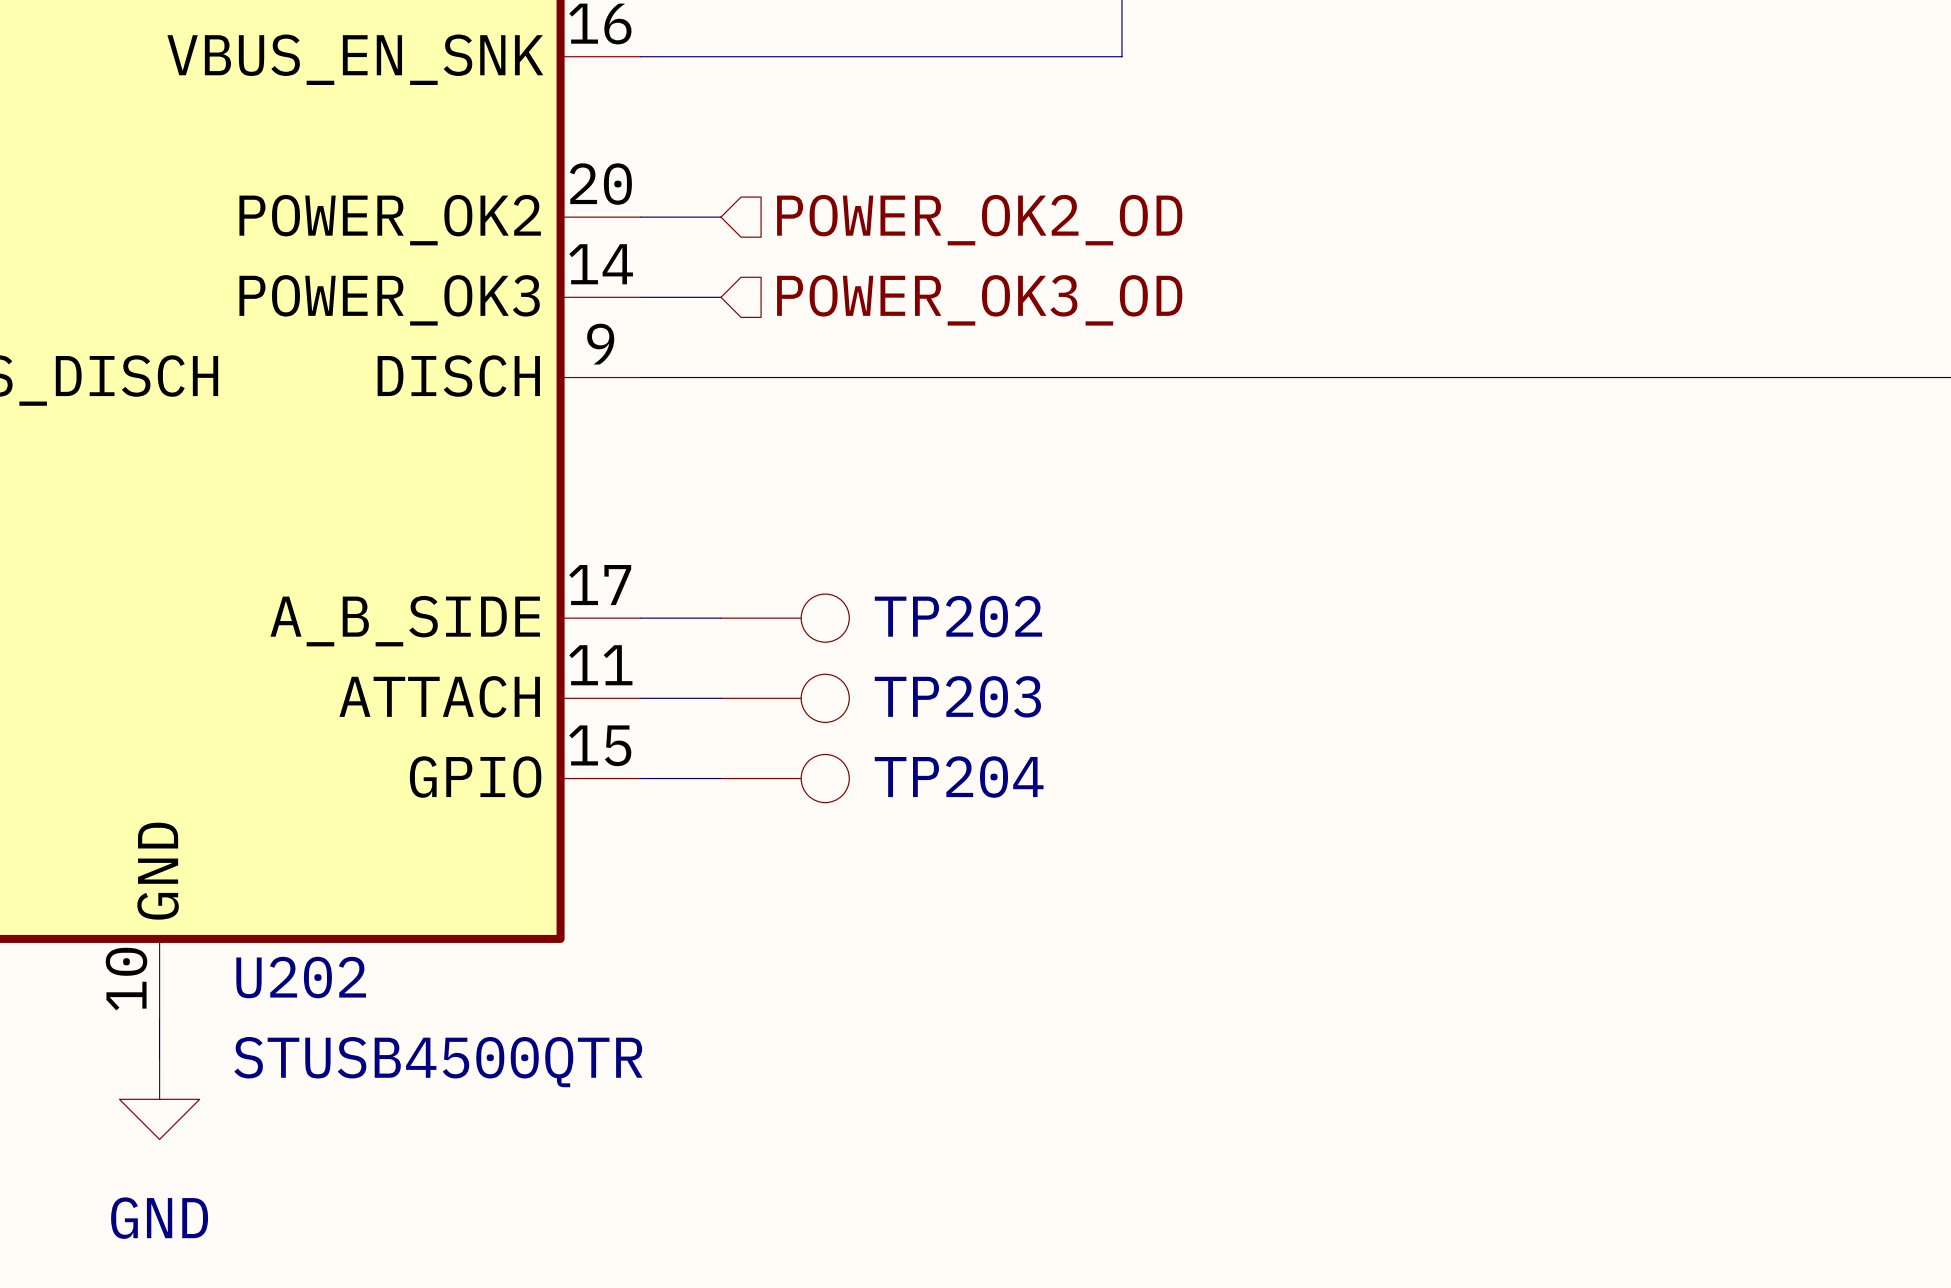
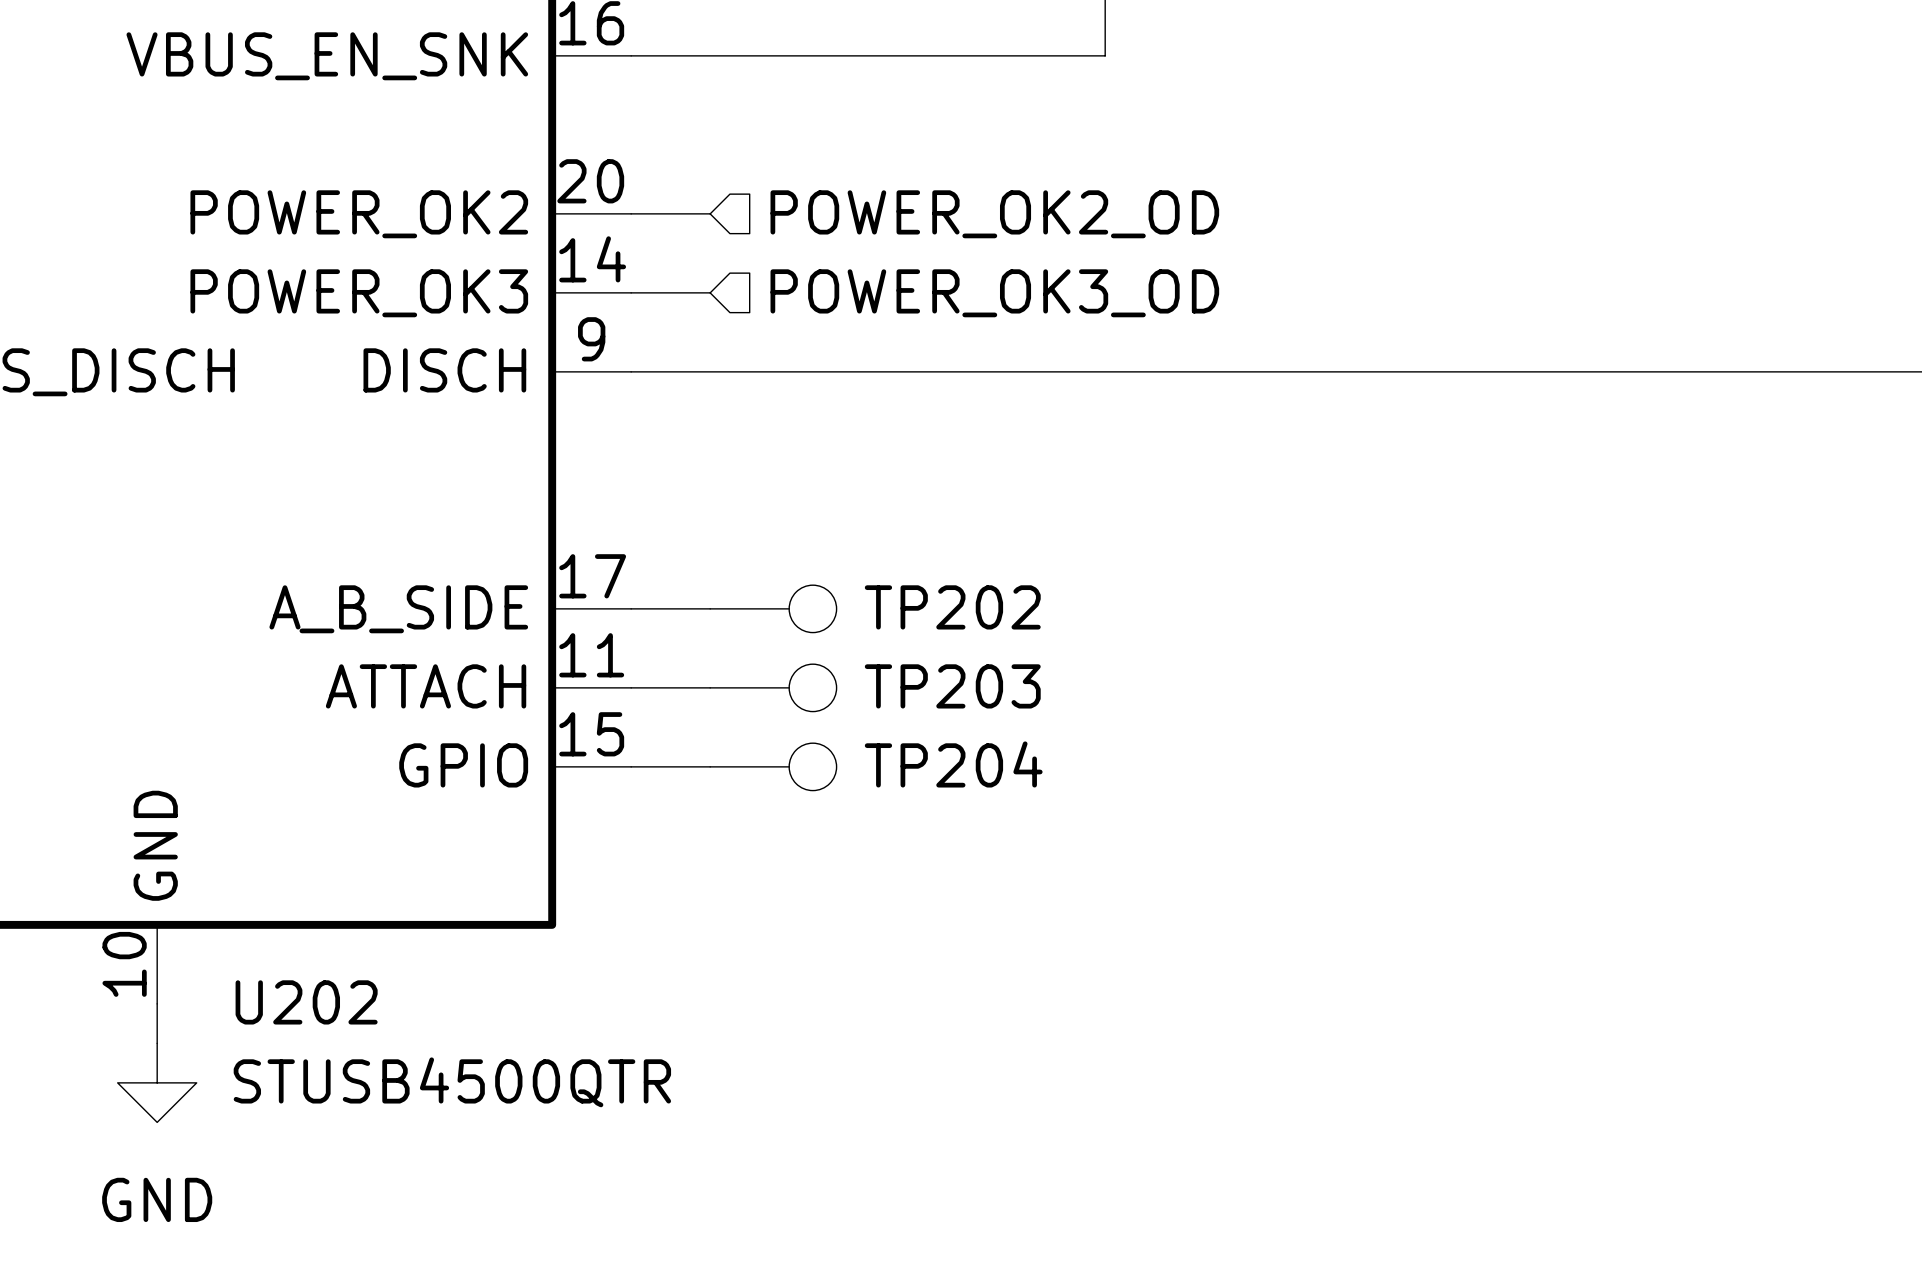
U202 name position: U202 (301, 977) -> U202 (306, 1002)
U202 value: STUSB4500QTR (438, 1062) -> none
U202 text: none -> STUSB4500QTR (452, 1082)

